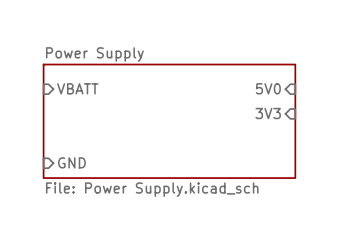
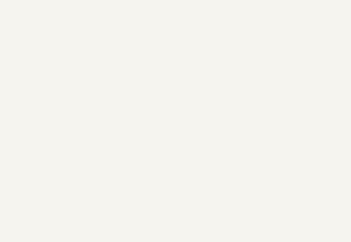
sheet pin: VBATT (77, 88) -> none
sheet pin: 5V0 (268, 88) -> none
sheet pin: 3V3 (268, 113) -> none
sheet Power Supply: File: Power Supply.kicad_sch (169, 121) -> none
sheet pin: GND (71, 162) -> none

